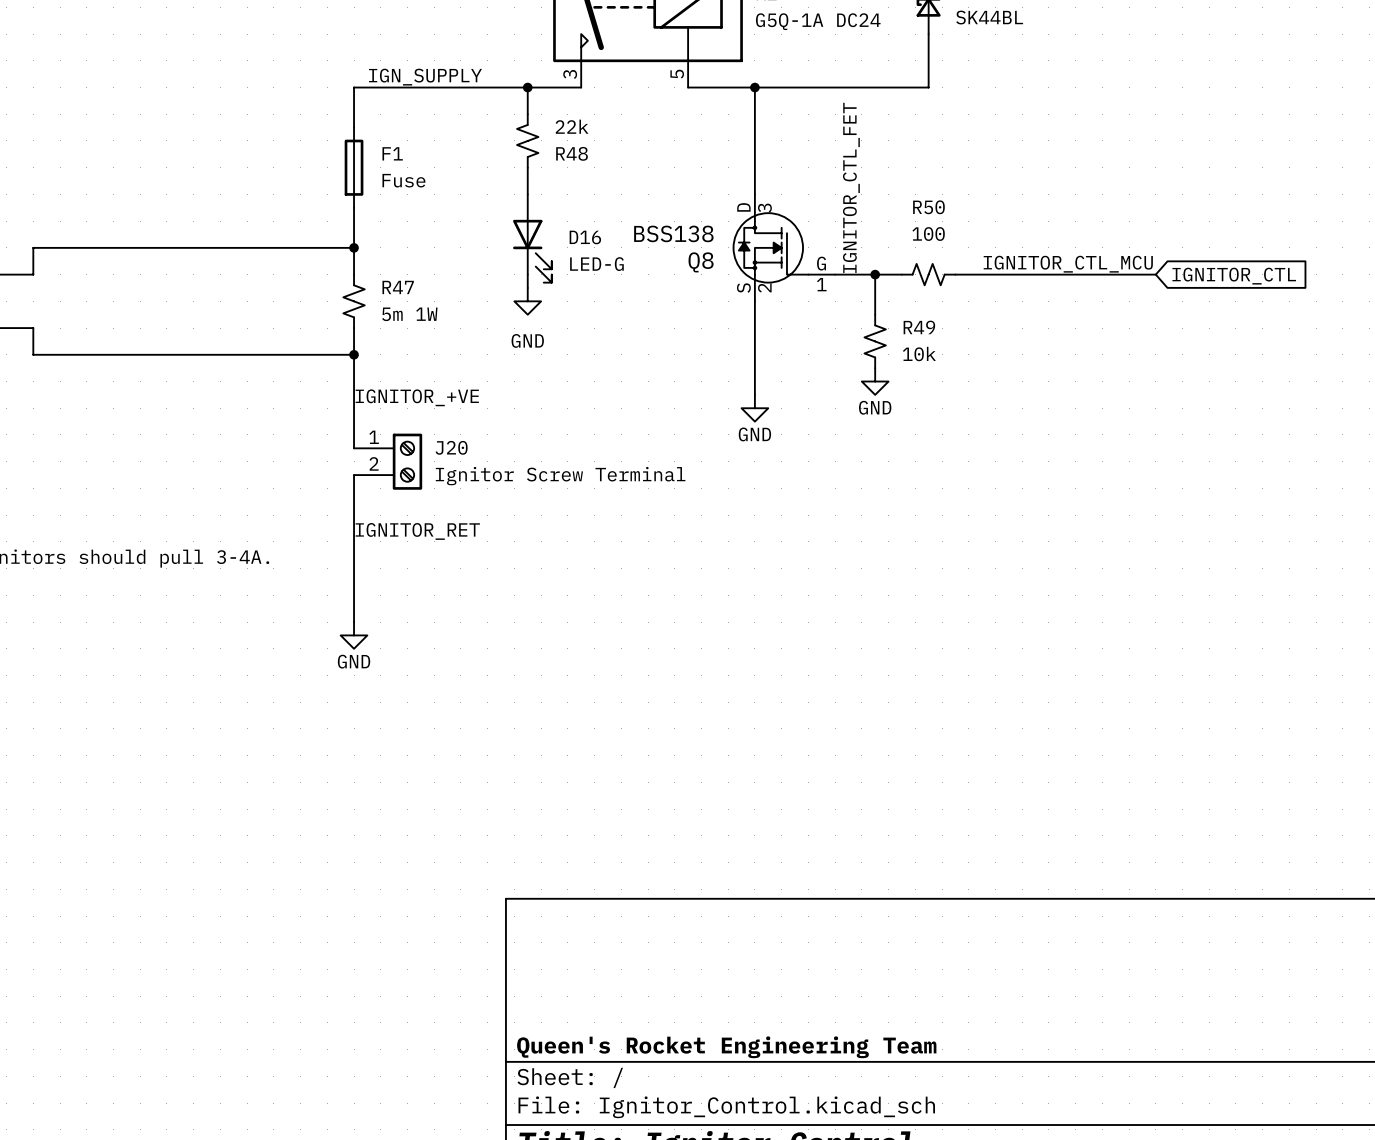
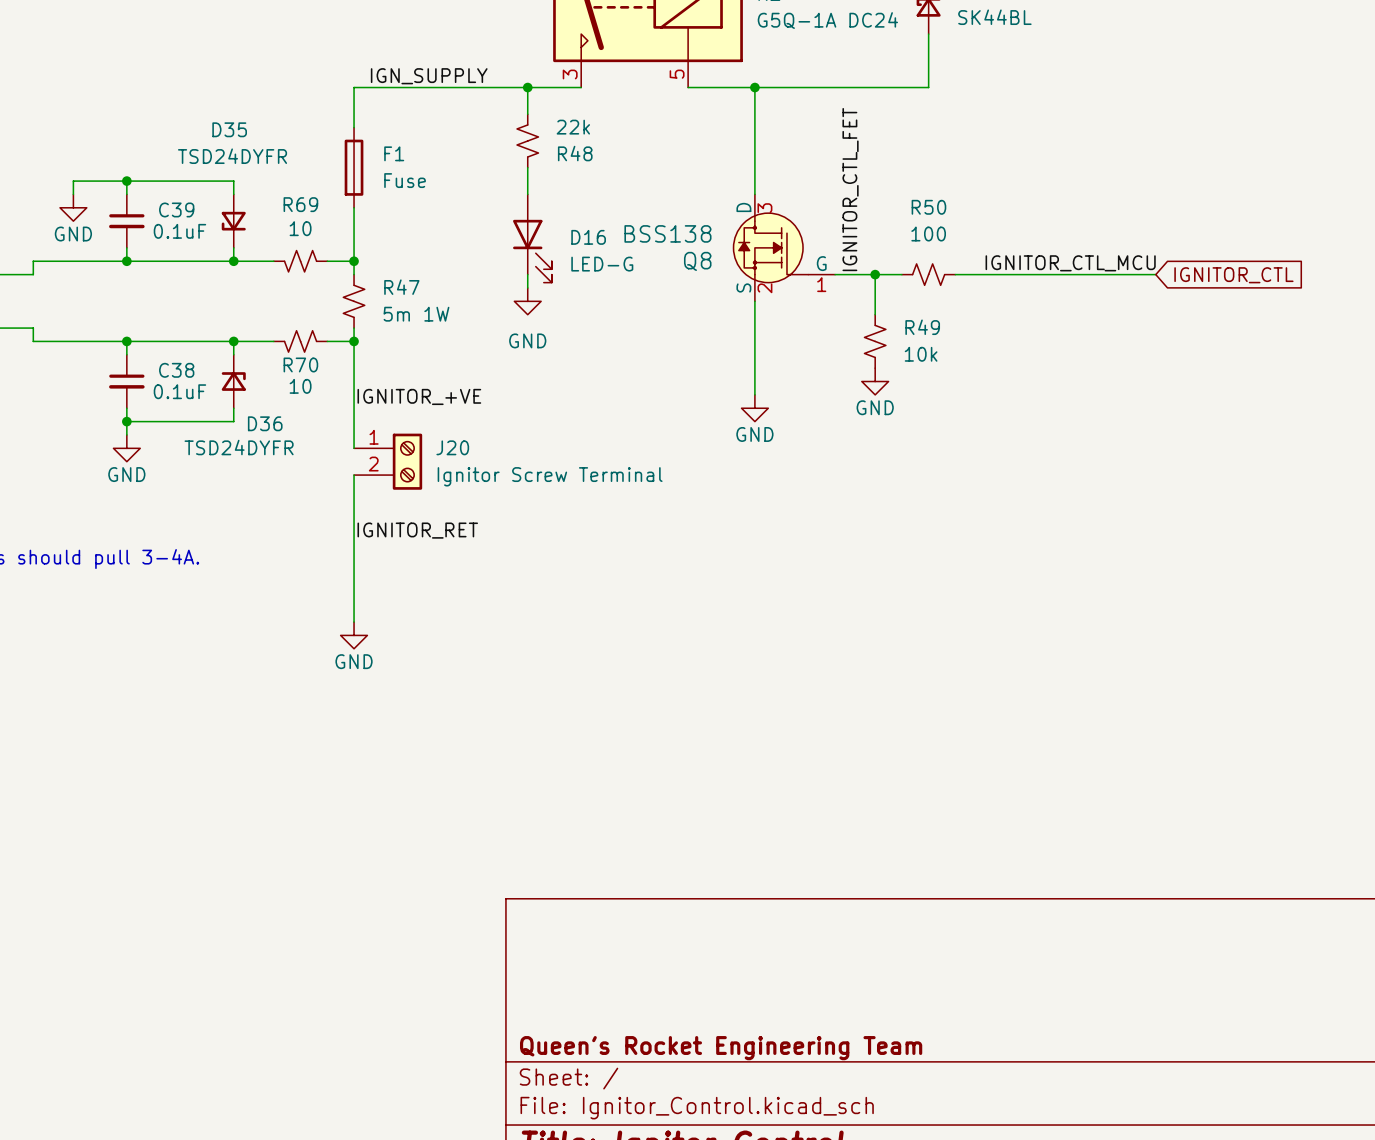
wire: none -> (126, 181) (126, 194)
junction: none -> (126, 181)
wire: none -> (73, 194) (73, 181) (233, 181) (233, 194)
power symbol: none -> GND (73, 207)
C39: none -> 0.1uF (126, 221)
D35: none -> TSD24DYFR (233, 221)
wire: none -> (126, 247) (126, 261)
wire: none -> (233, 247) (233, 261)
wire: (354, 247) (33, 247) (33, 261) -> (273, 261) (33, 261)
junction position: (354, 247) -> (354, 261)
junction: none -> (126, 261)
junction: none -> (233, 261)
R69: none -> 10 (300, 261)
wire: none -> (327, 261) (354, 261)
wire: (33, 341) (33, 354) (354, 354) -> (33, 341) (273, 341)
wire: none -> (126, 341) (126, 354)
junction: none -> (126, 341)
wire: none -> (233, 341) (233, 354)
junction: none -> (233, 341)
R70: none -> 10 (300, 341)
wire: none -> (327, 341) (354, 341)
junction position: (354, 354) -> (354, 341)
C38: none -> 0.1uF (126, 381)
D36: none -> TSD24DYFR (233, 381)
wire: none -> (126, 408) (126, 434)
wire: none -> (233, 408) (233, 421) (126, 421)
junction: none -> (126, 421)
power symbol: none -> GND (126, 448)

